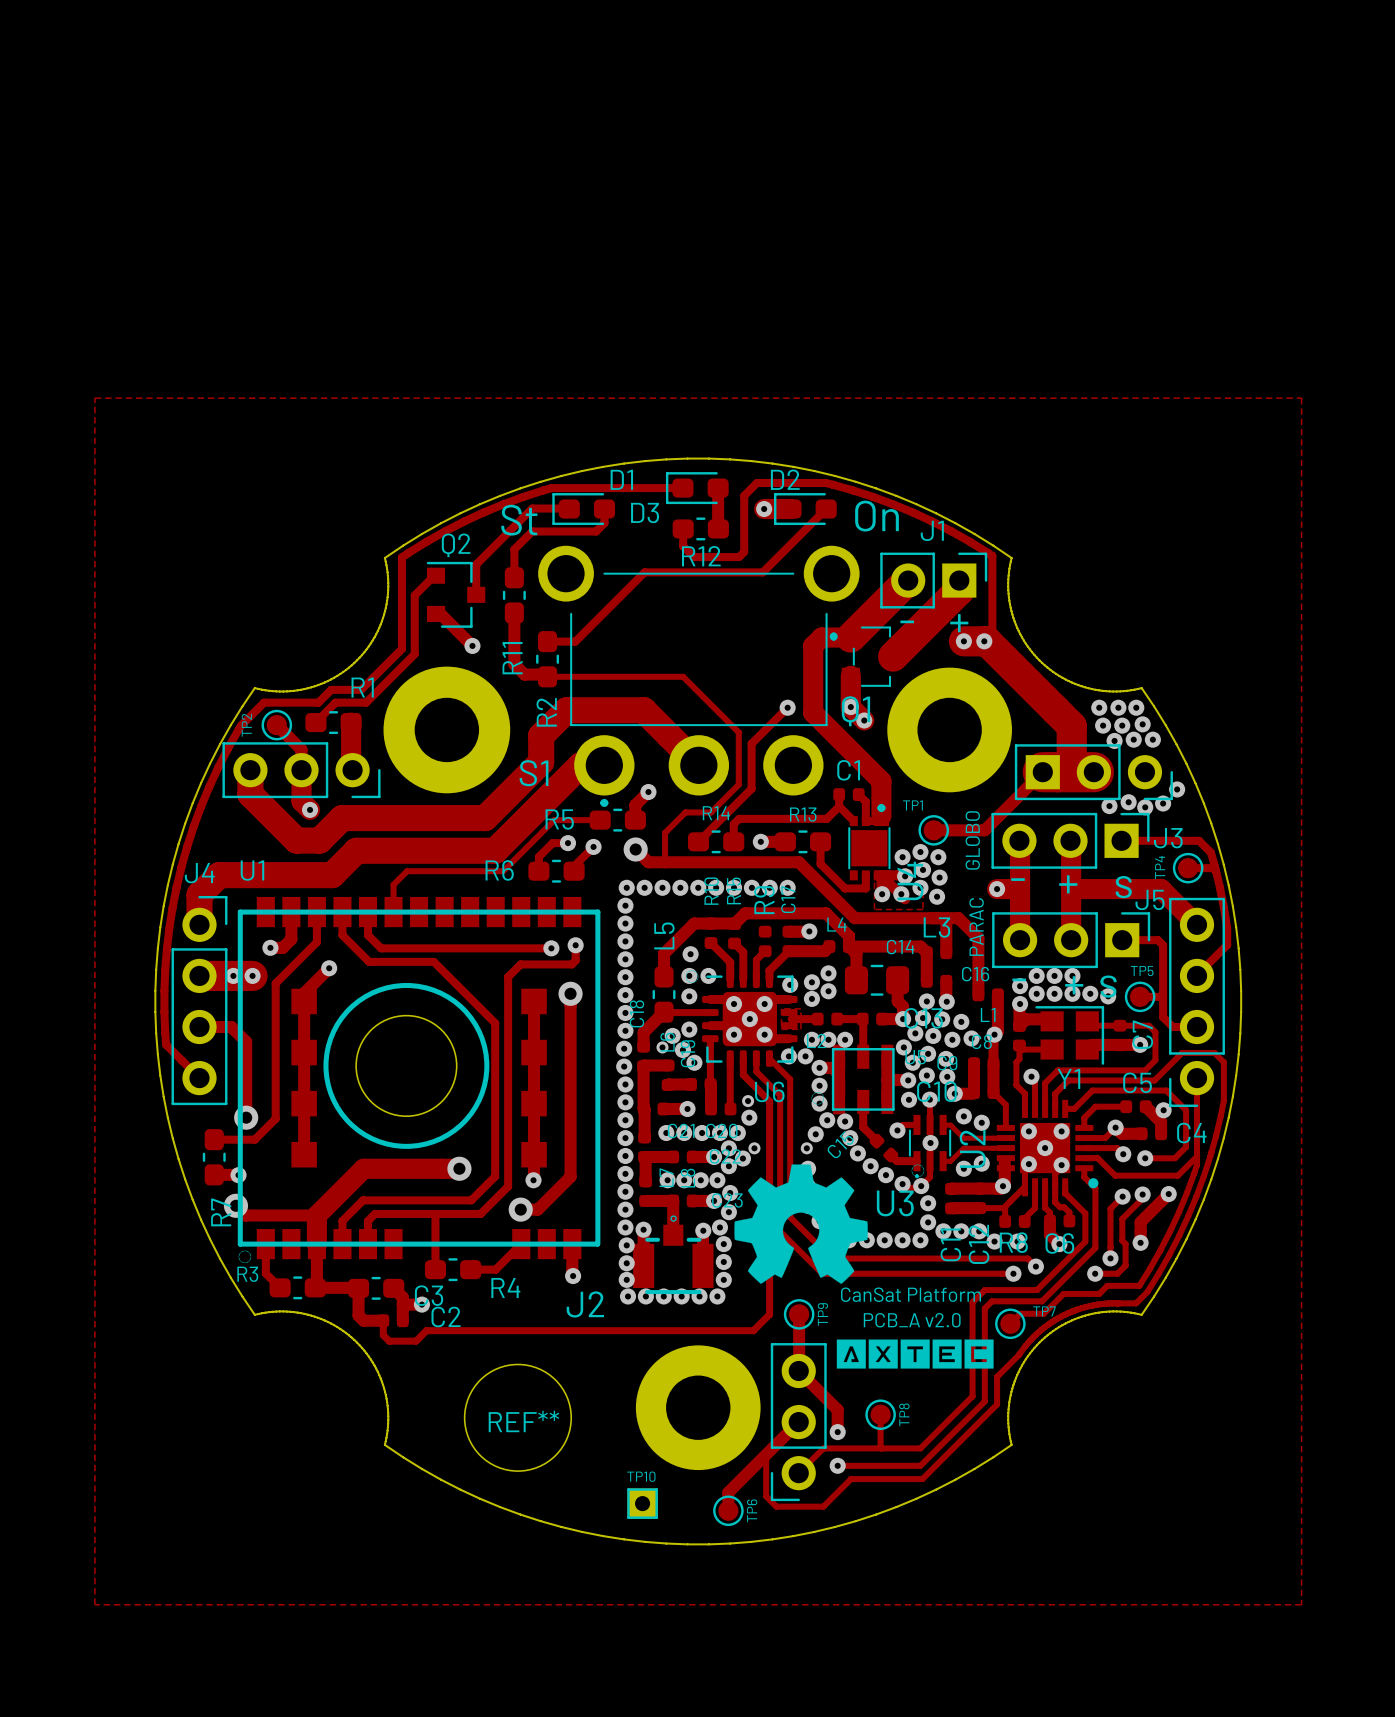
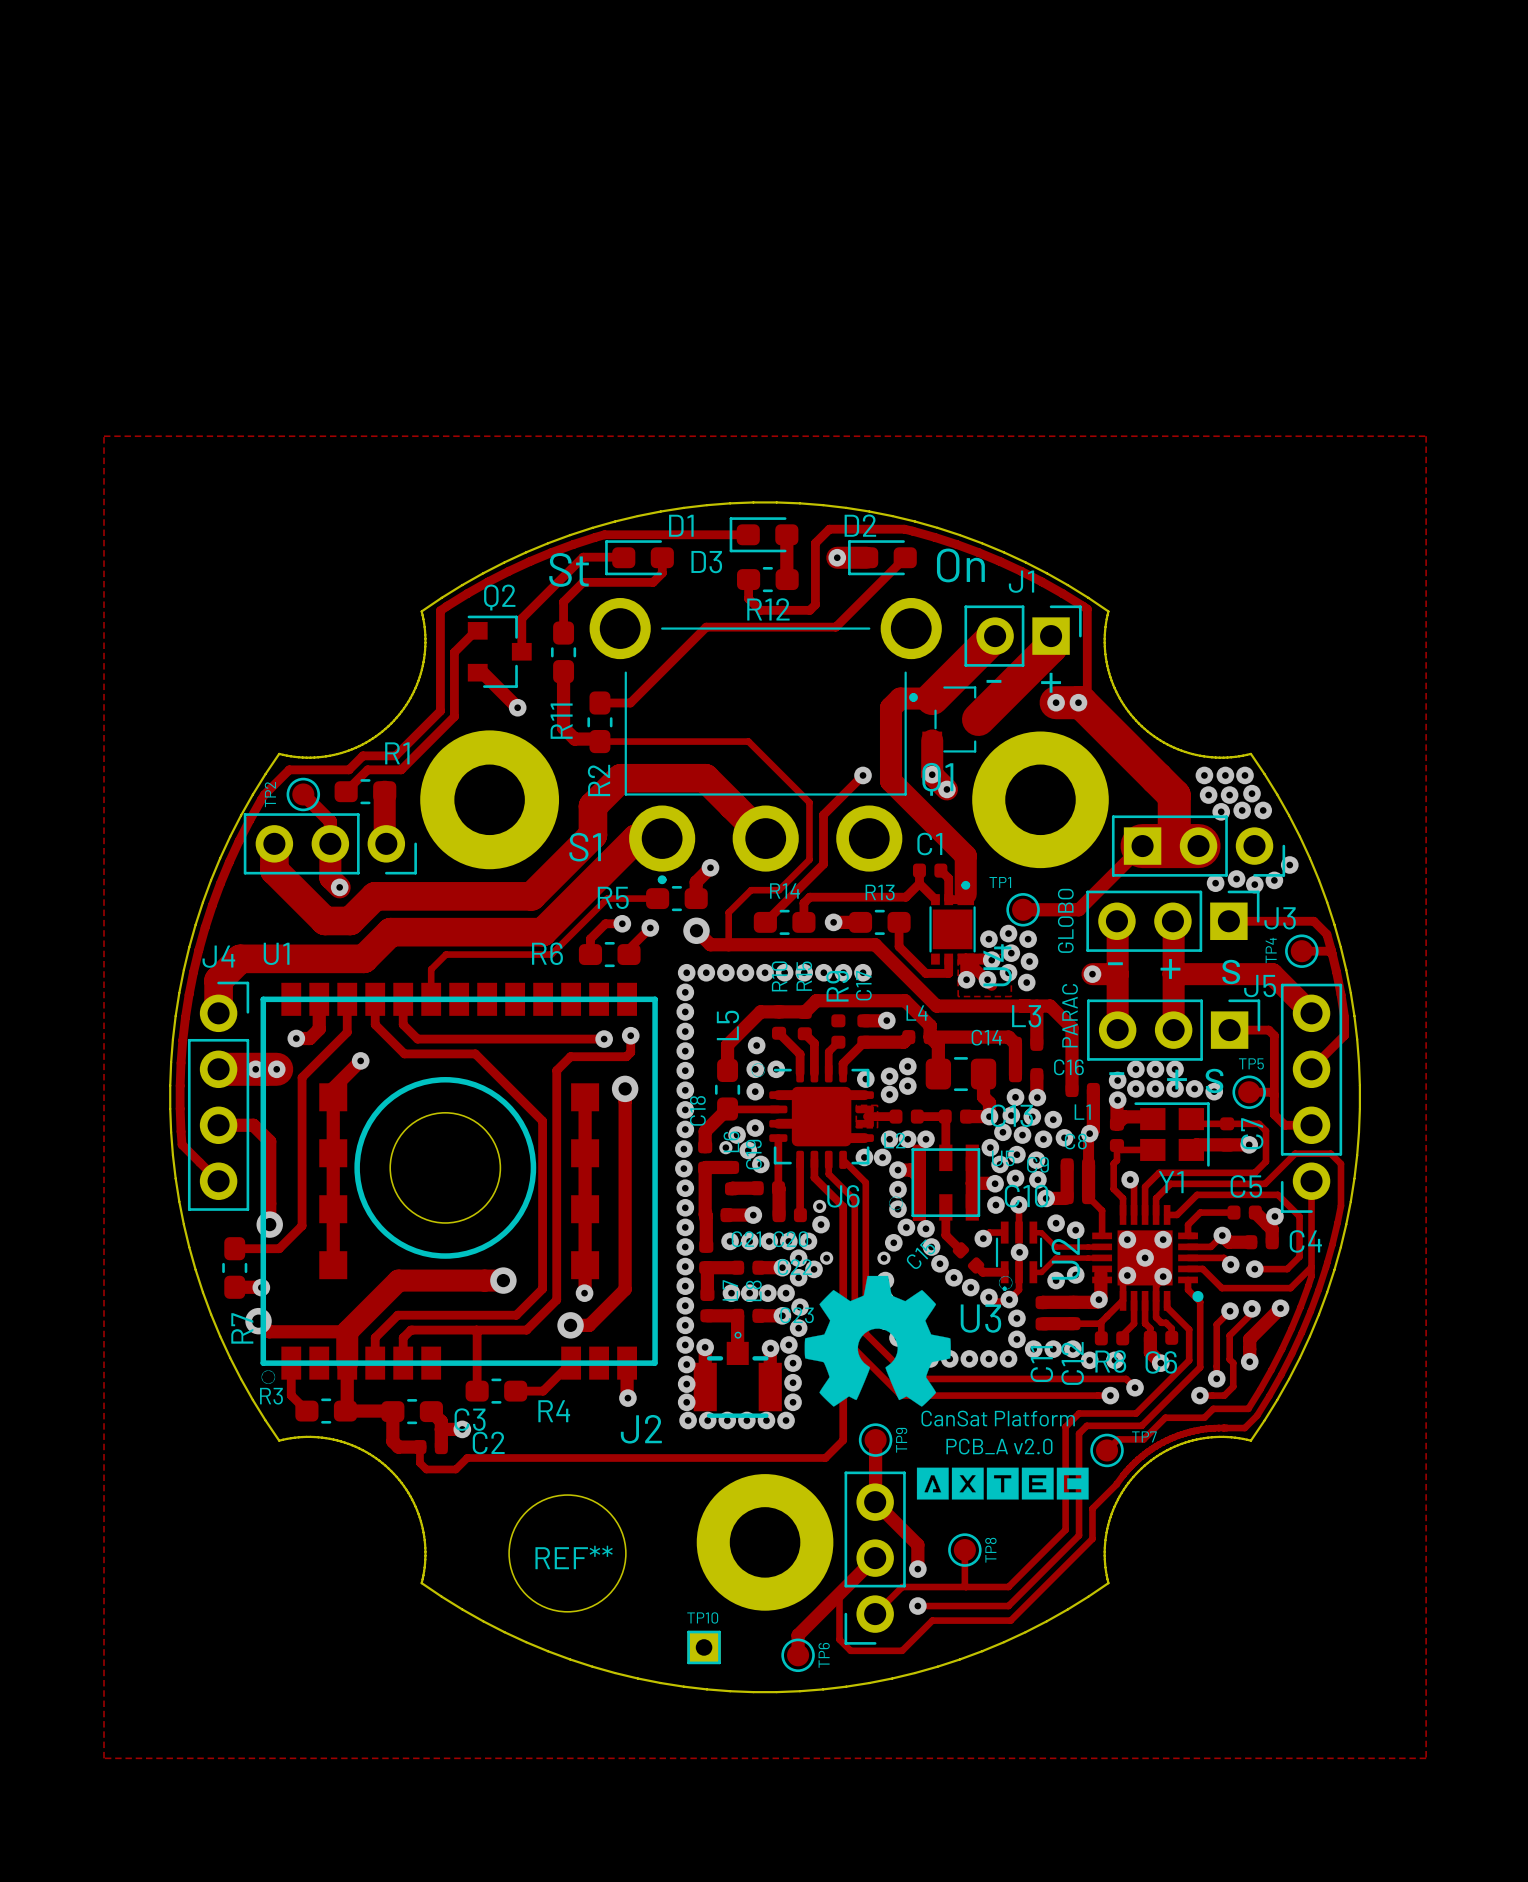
via: (734, 1004) -> none
via: (764, 1004) -> none
via: (749, 1019) -> none
via: (734, 1034) -> none
via: (764, 1034) -> none

